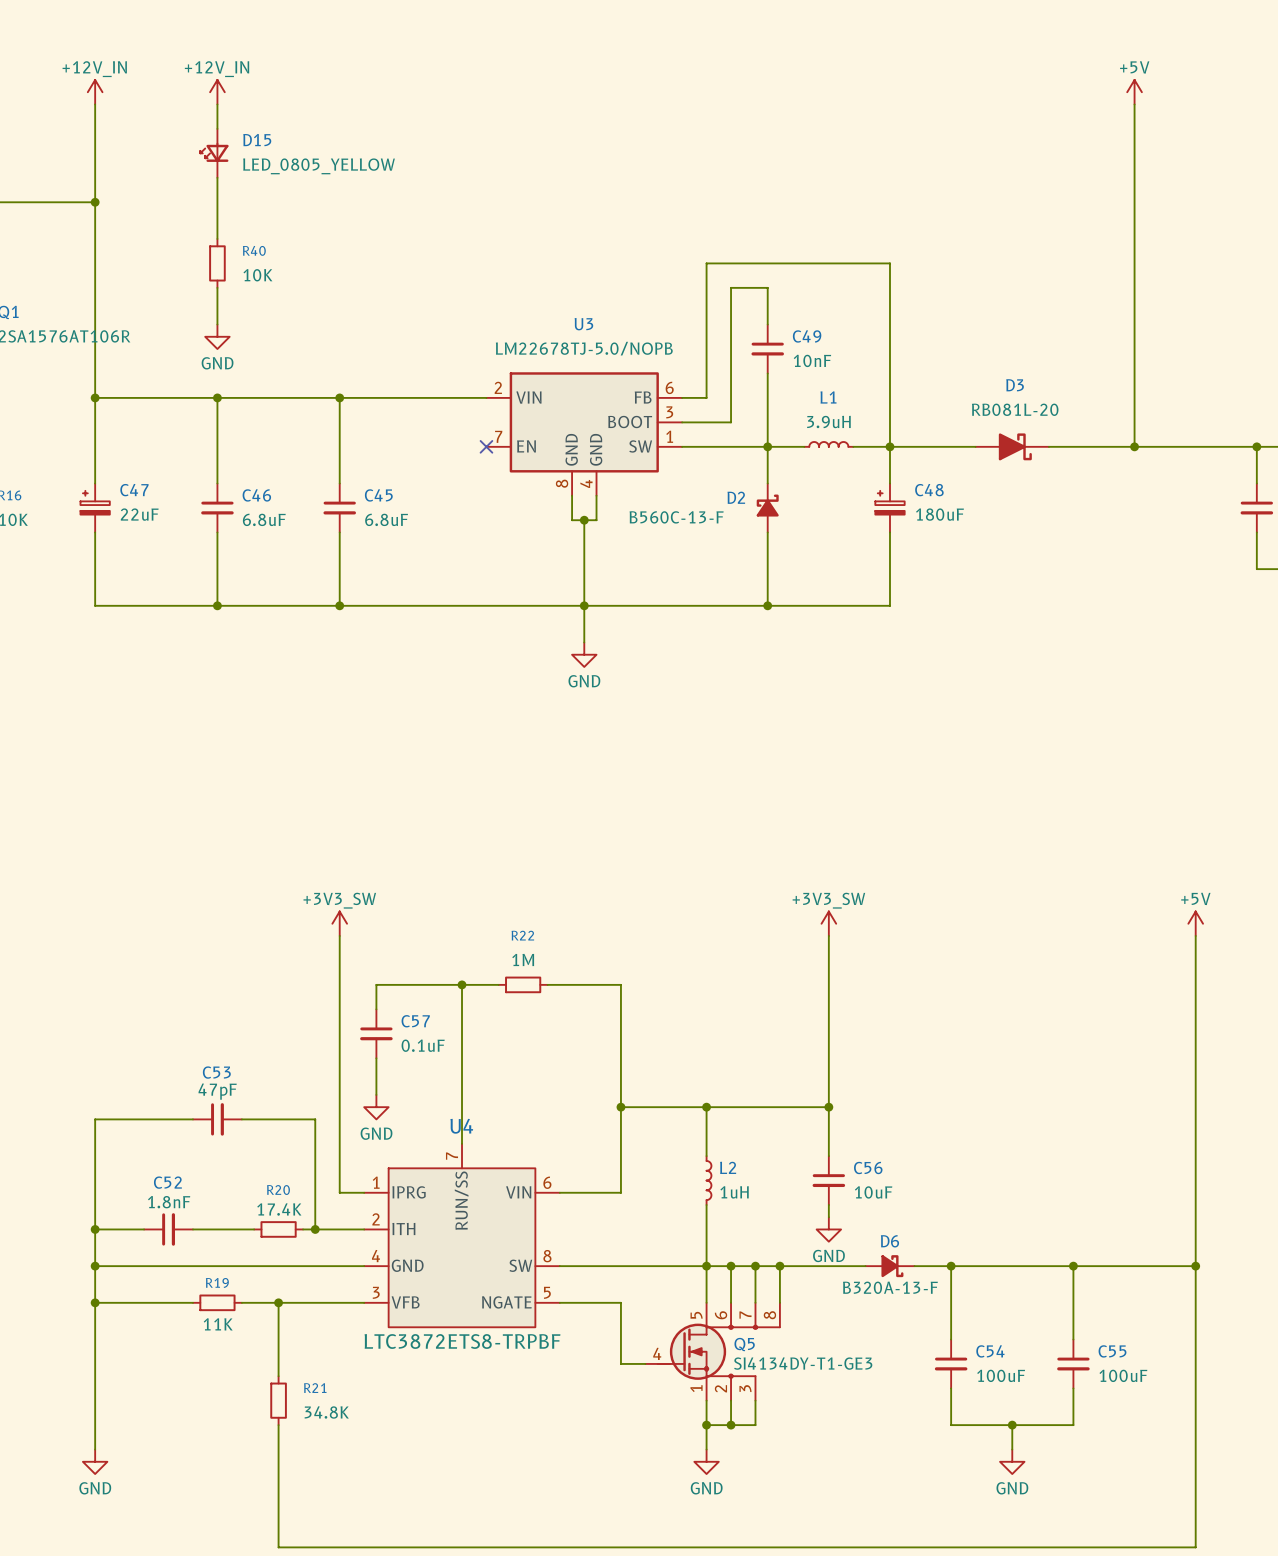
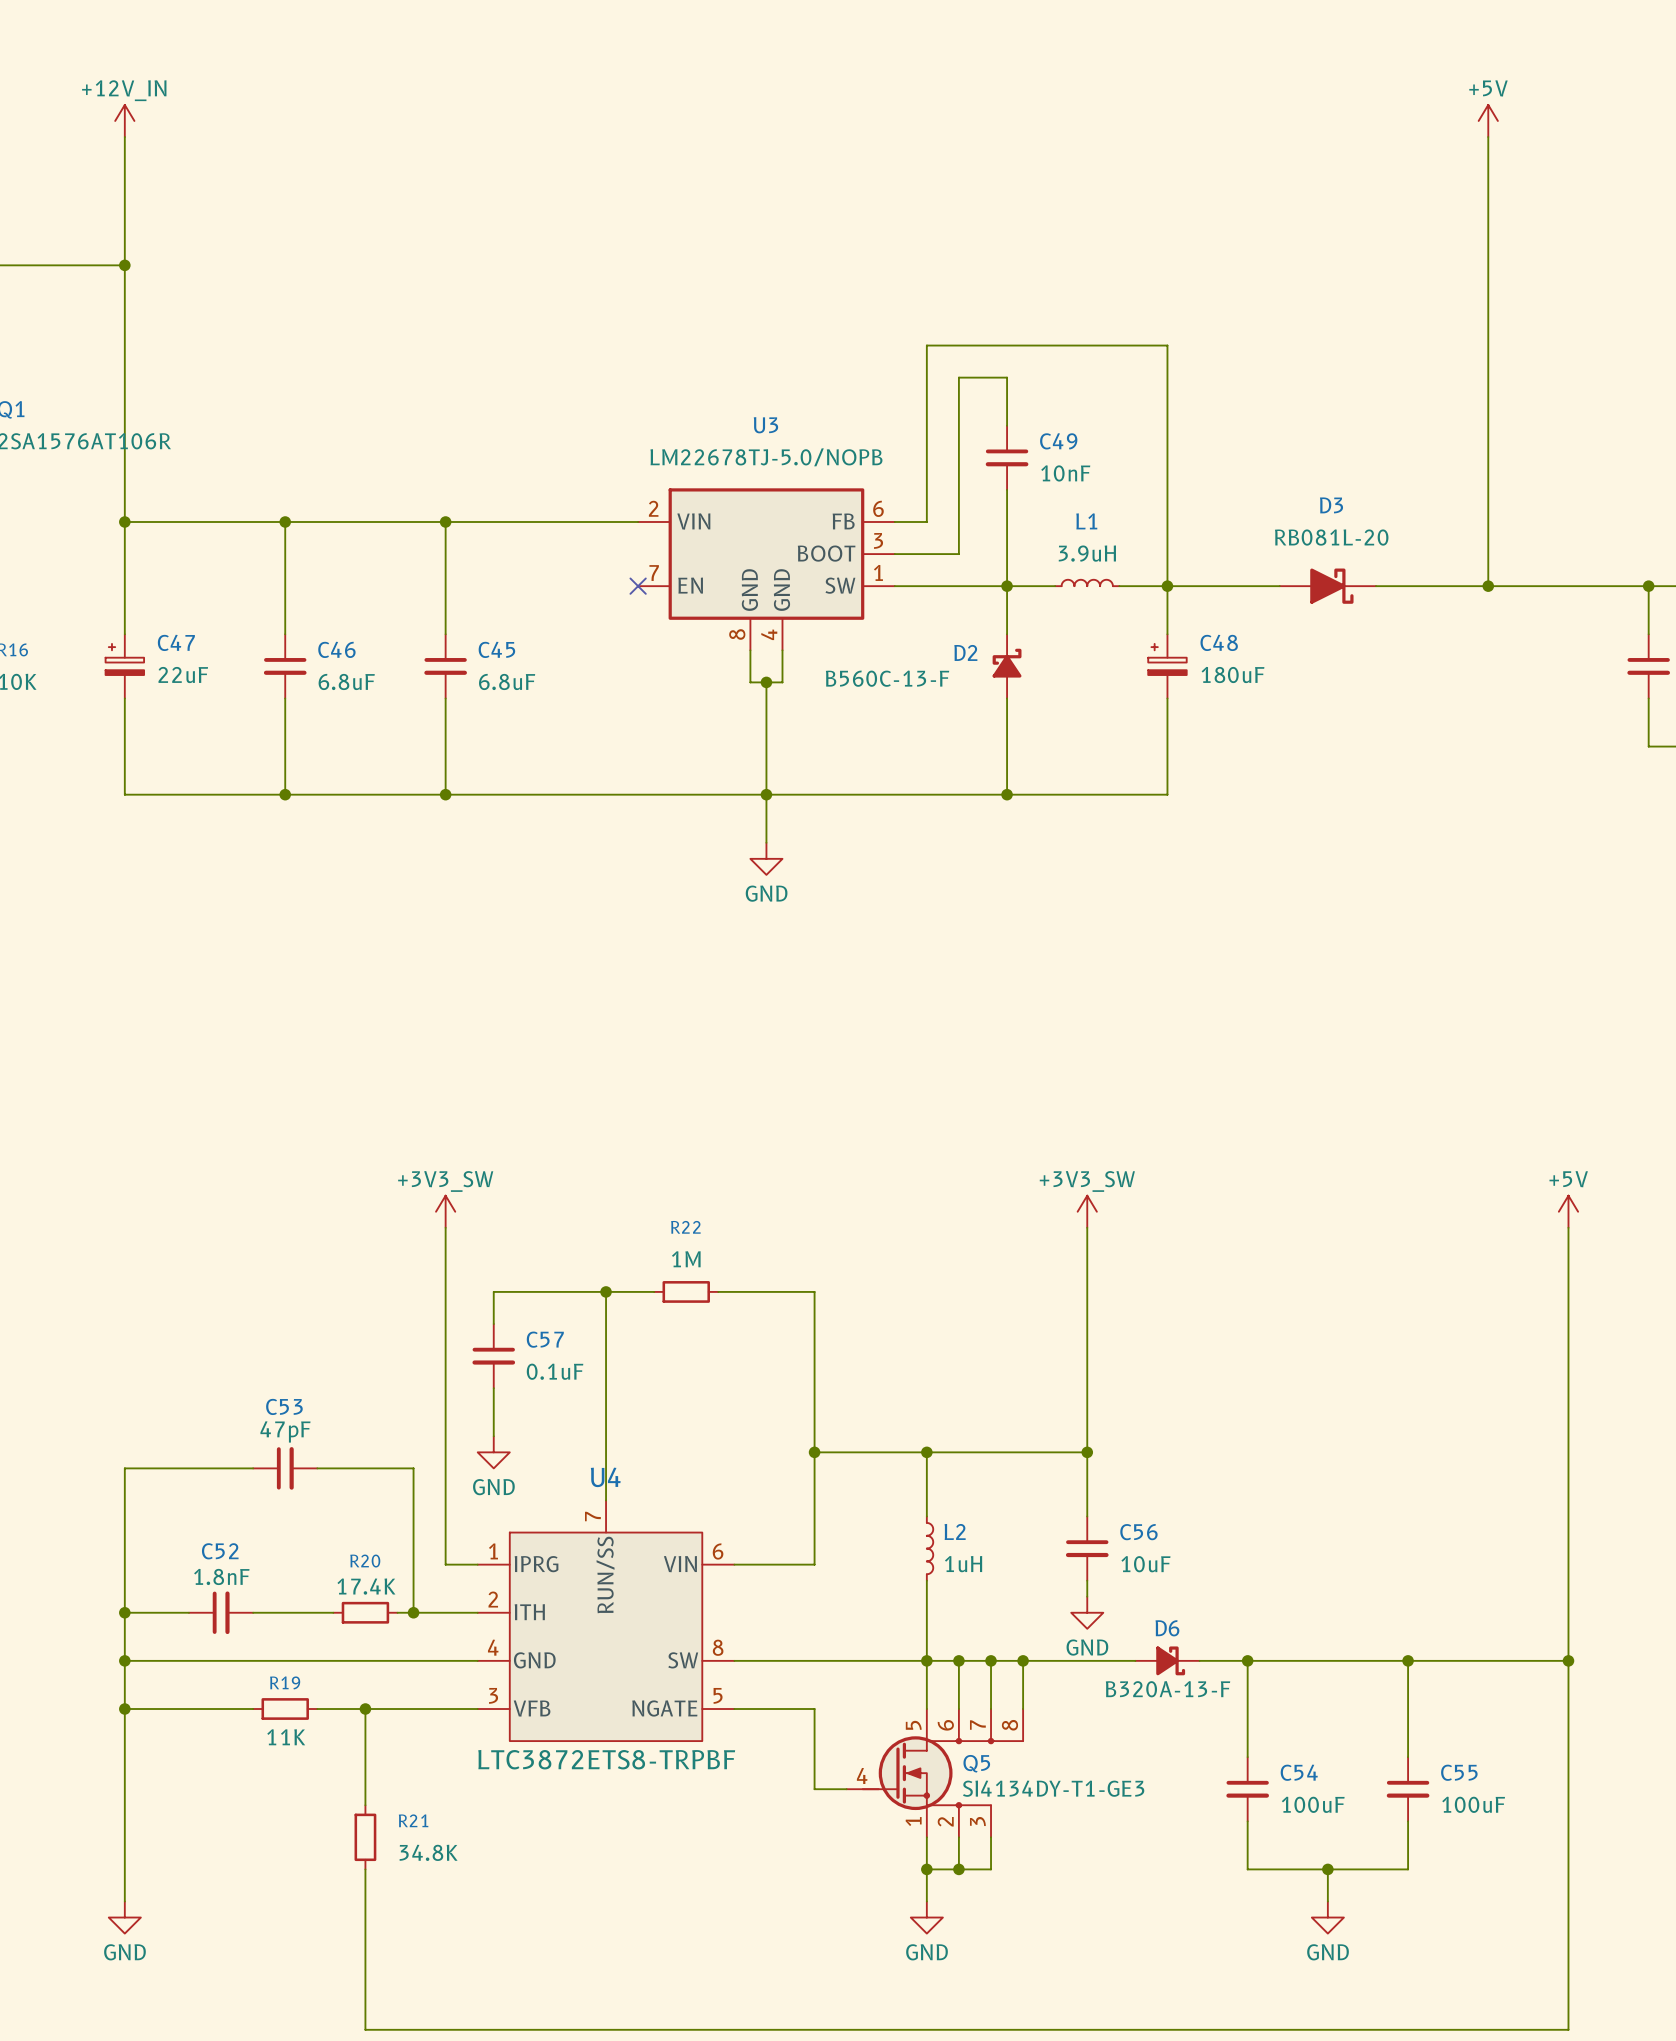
power symbol: +12V_IN (217, 92) -> none
wire: (217, 104) (217, 128) -> none
D15: LED_0805_YELLOW (214, 153) -> none
wire: (217, 177) (217, 238) -> none
R40: 10K (217, 263) -> none
wire: (217, 287) (217, 324) -> none
power symbol: GND (217, 336) -> none

